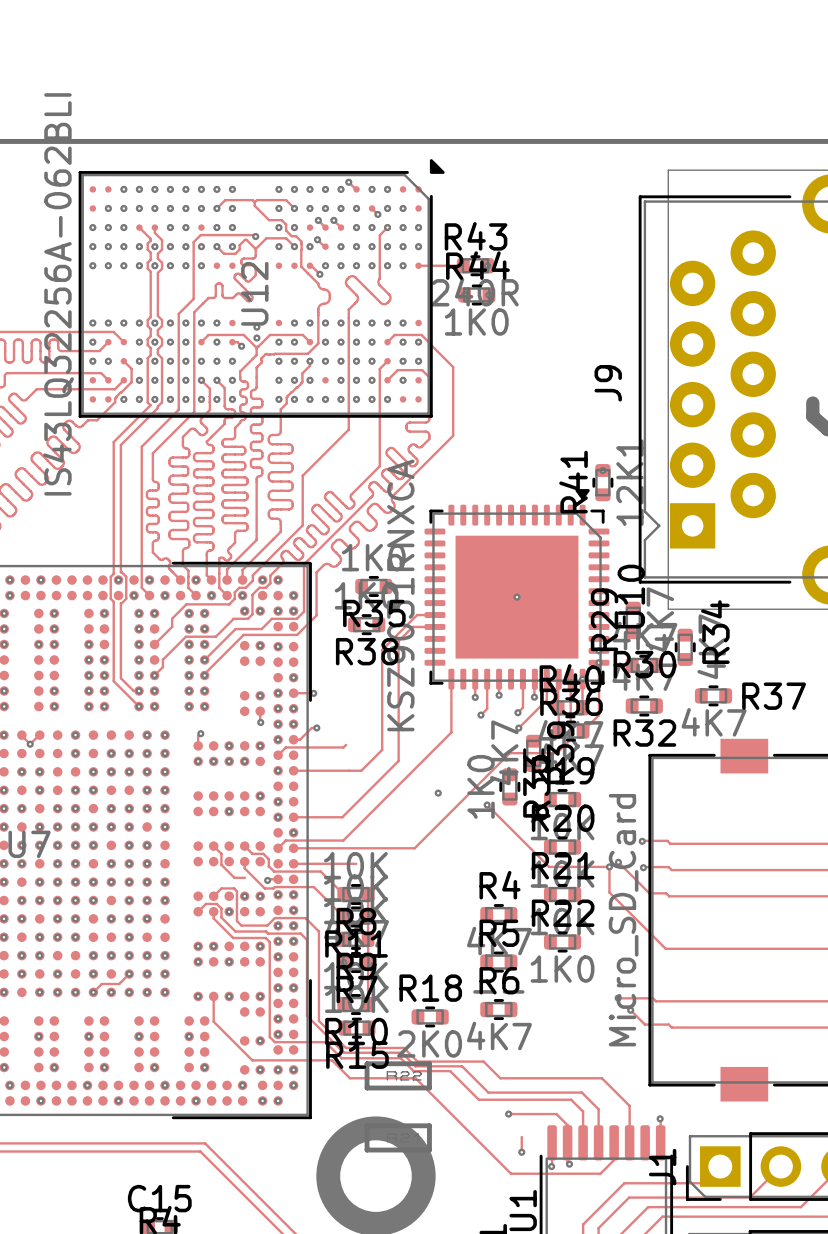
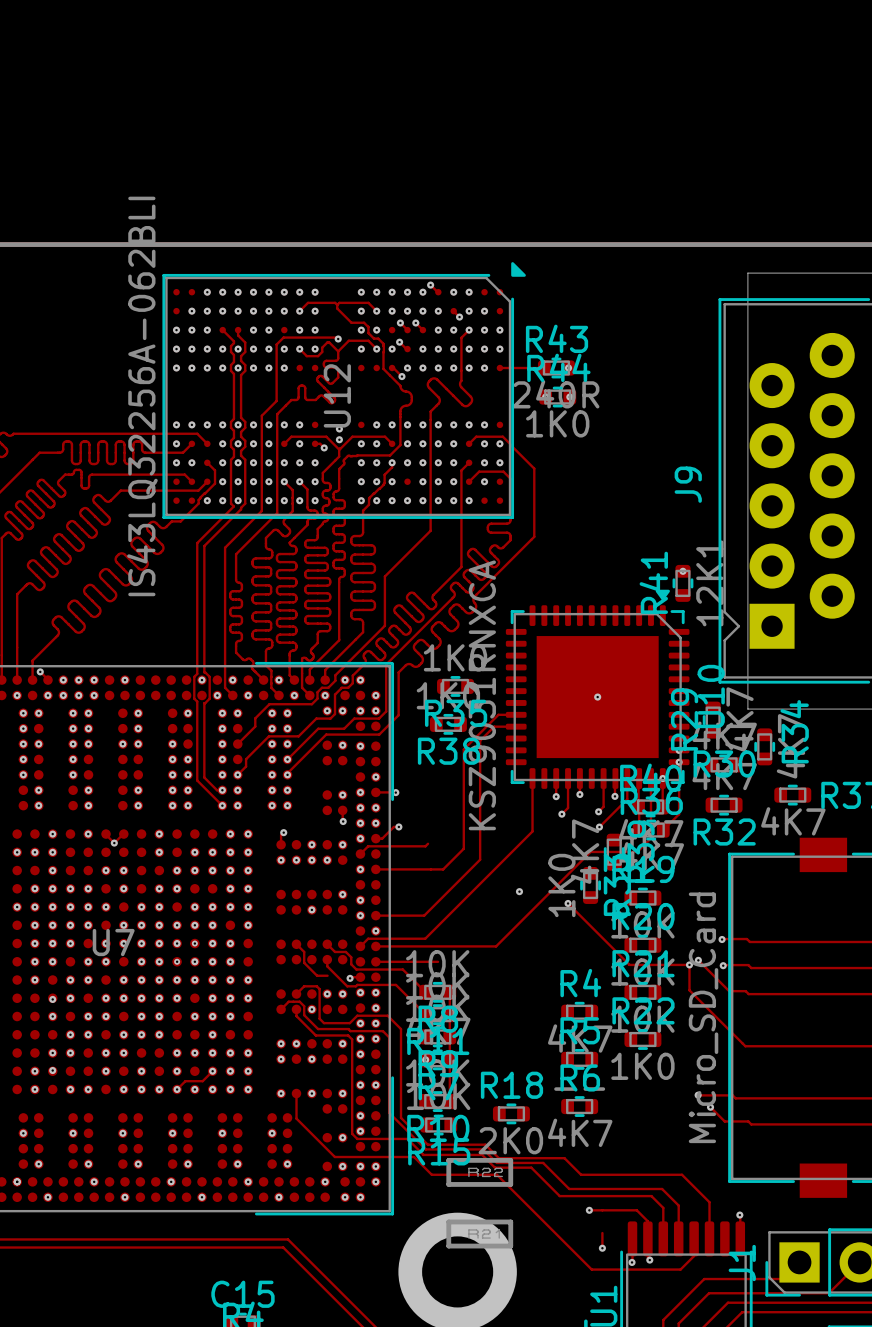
via: none -> (194, 943)
via: none -> (177, 961)

